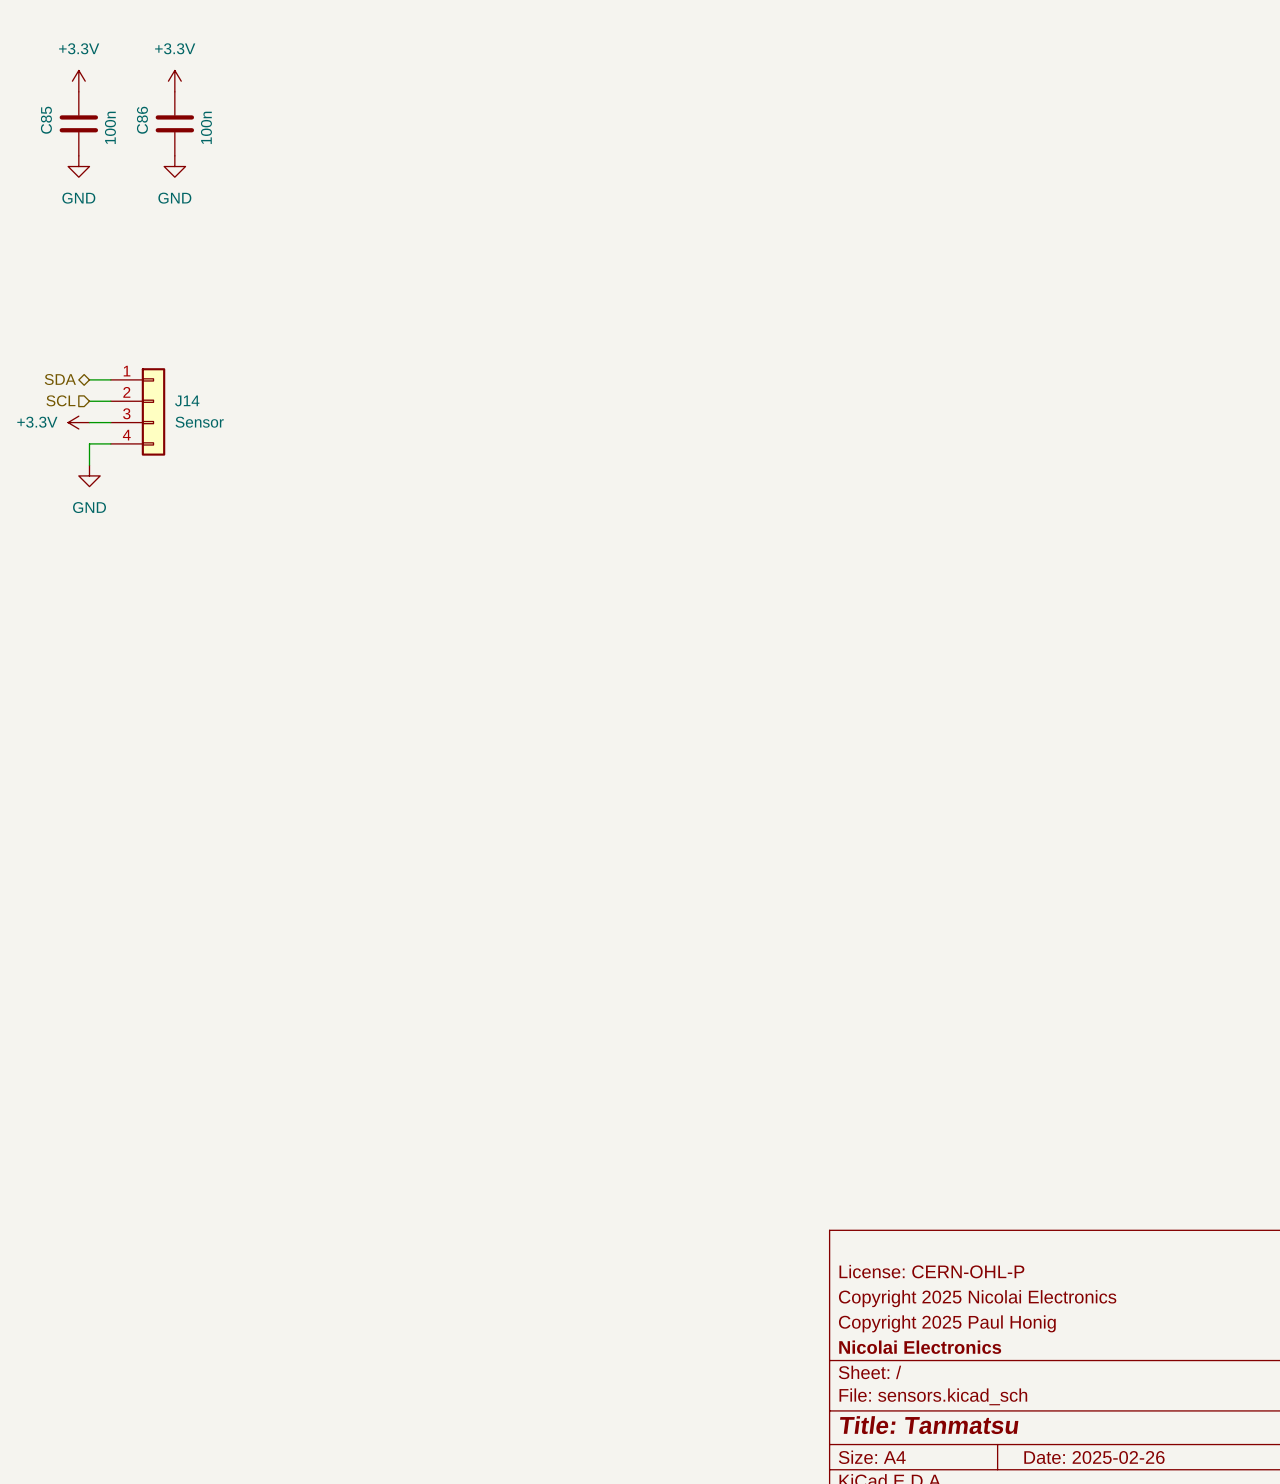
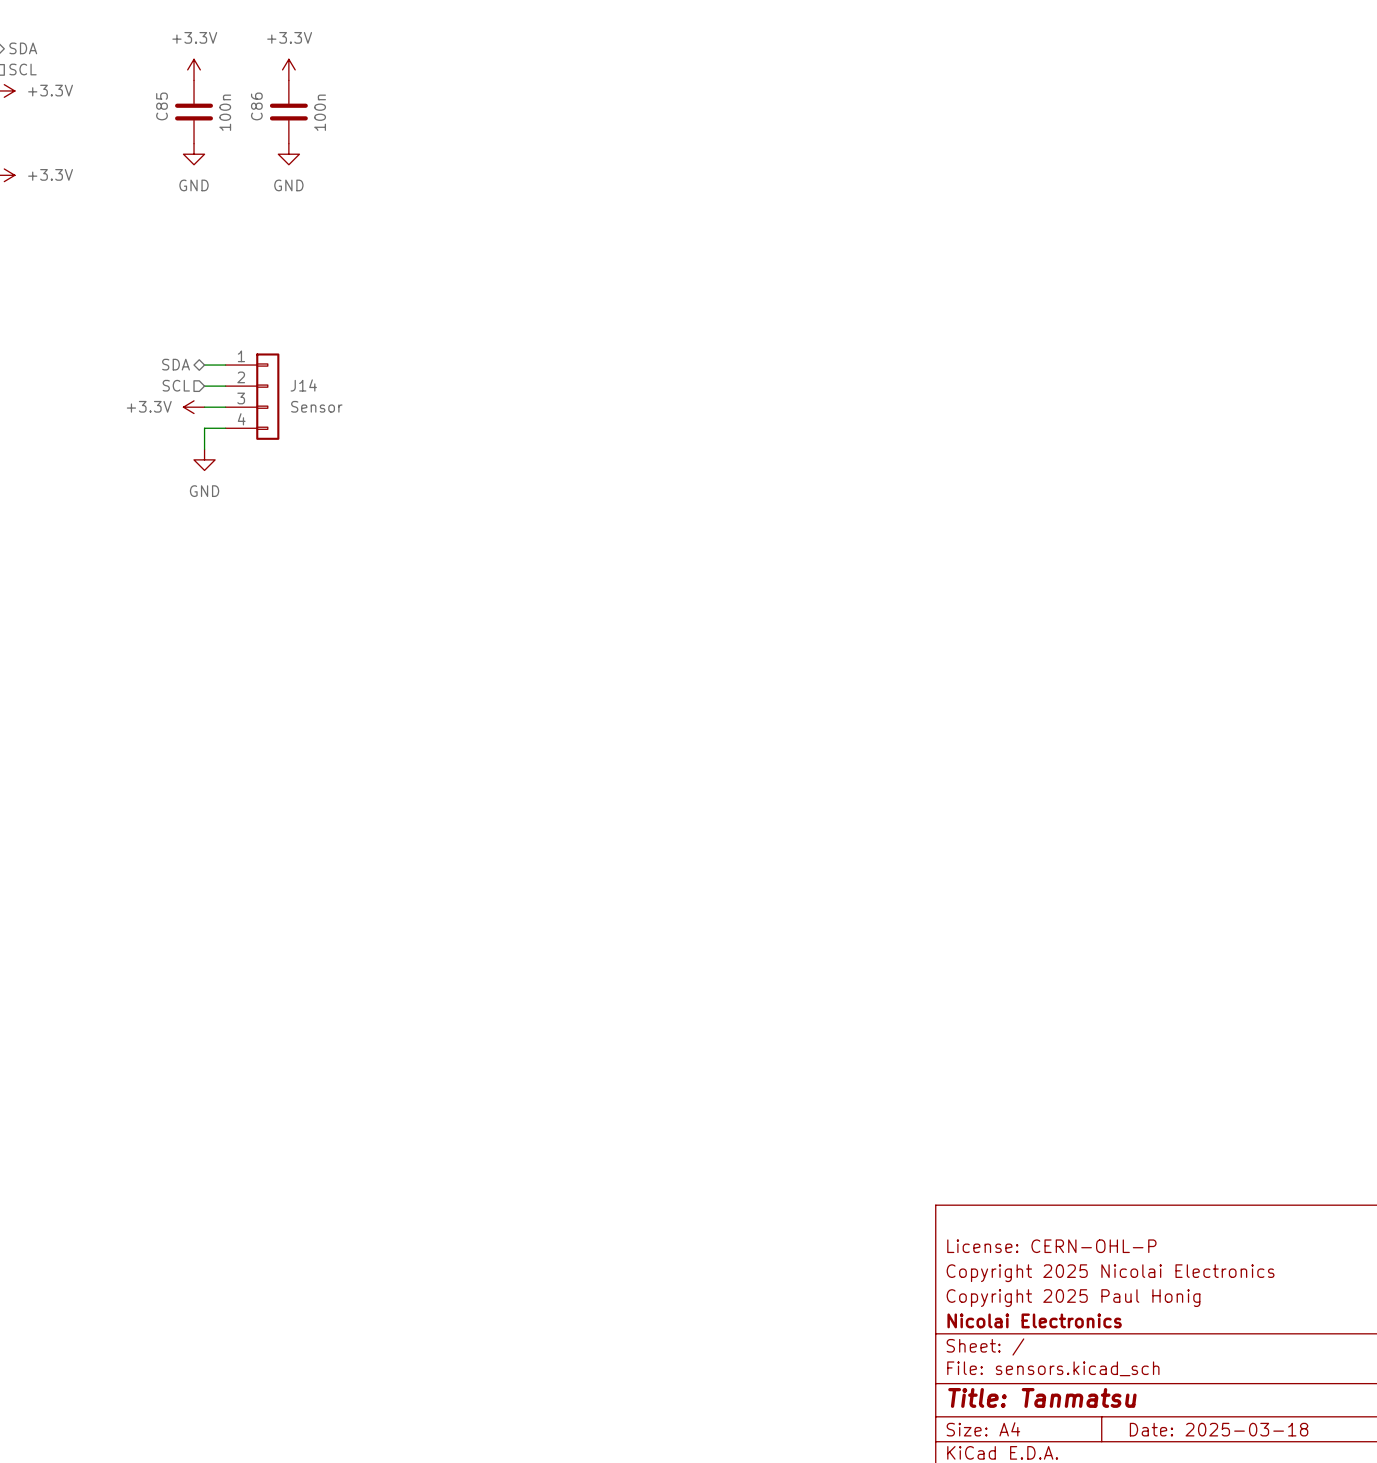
title block: Date: 2025-02-26 (1094, 1457) -> Date: 2025-03-18 (1219, 1429)

